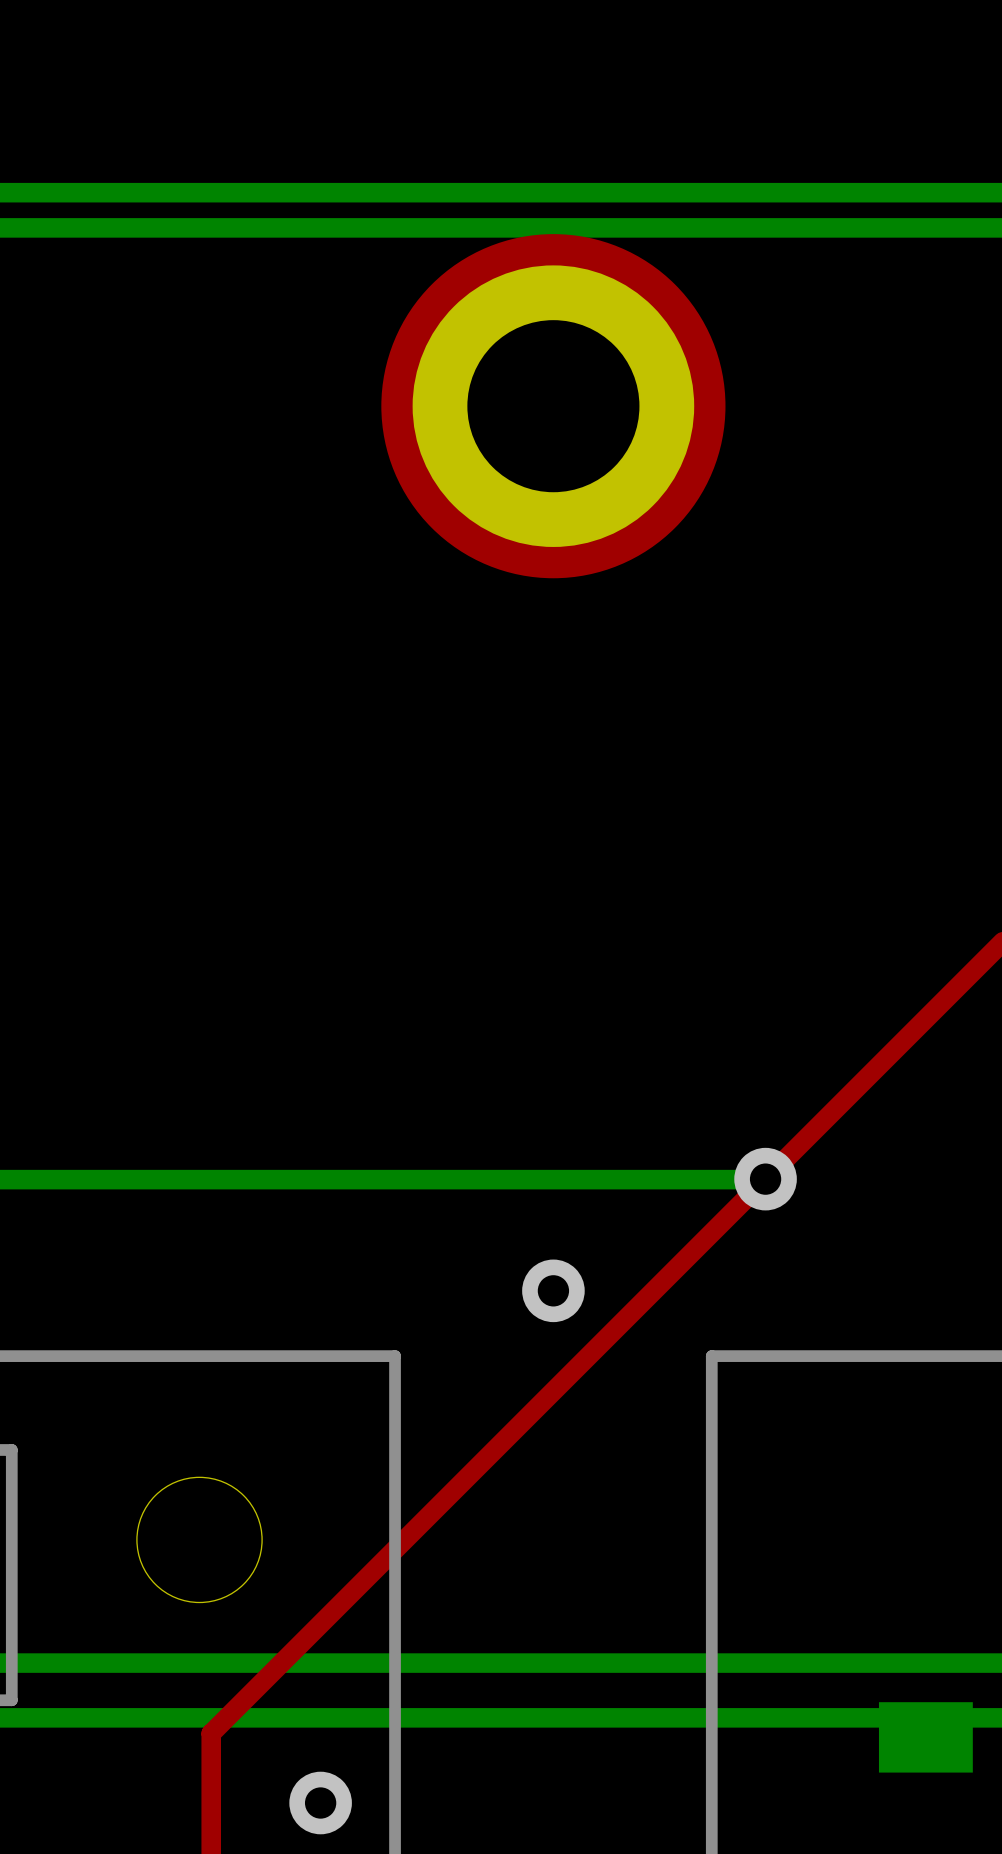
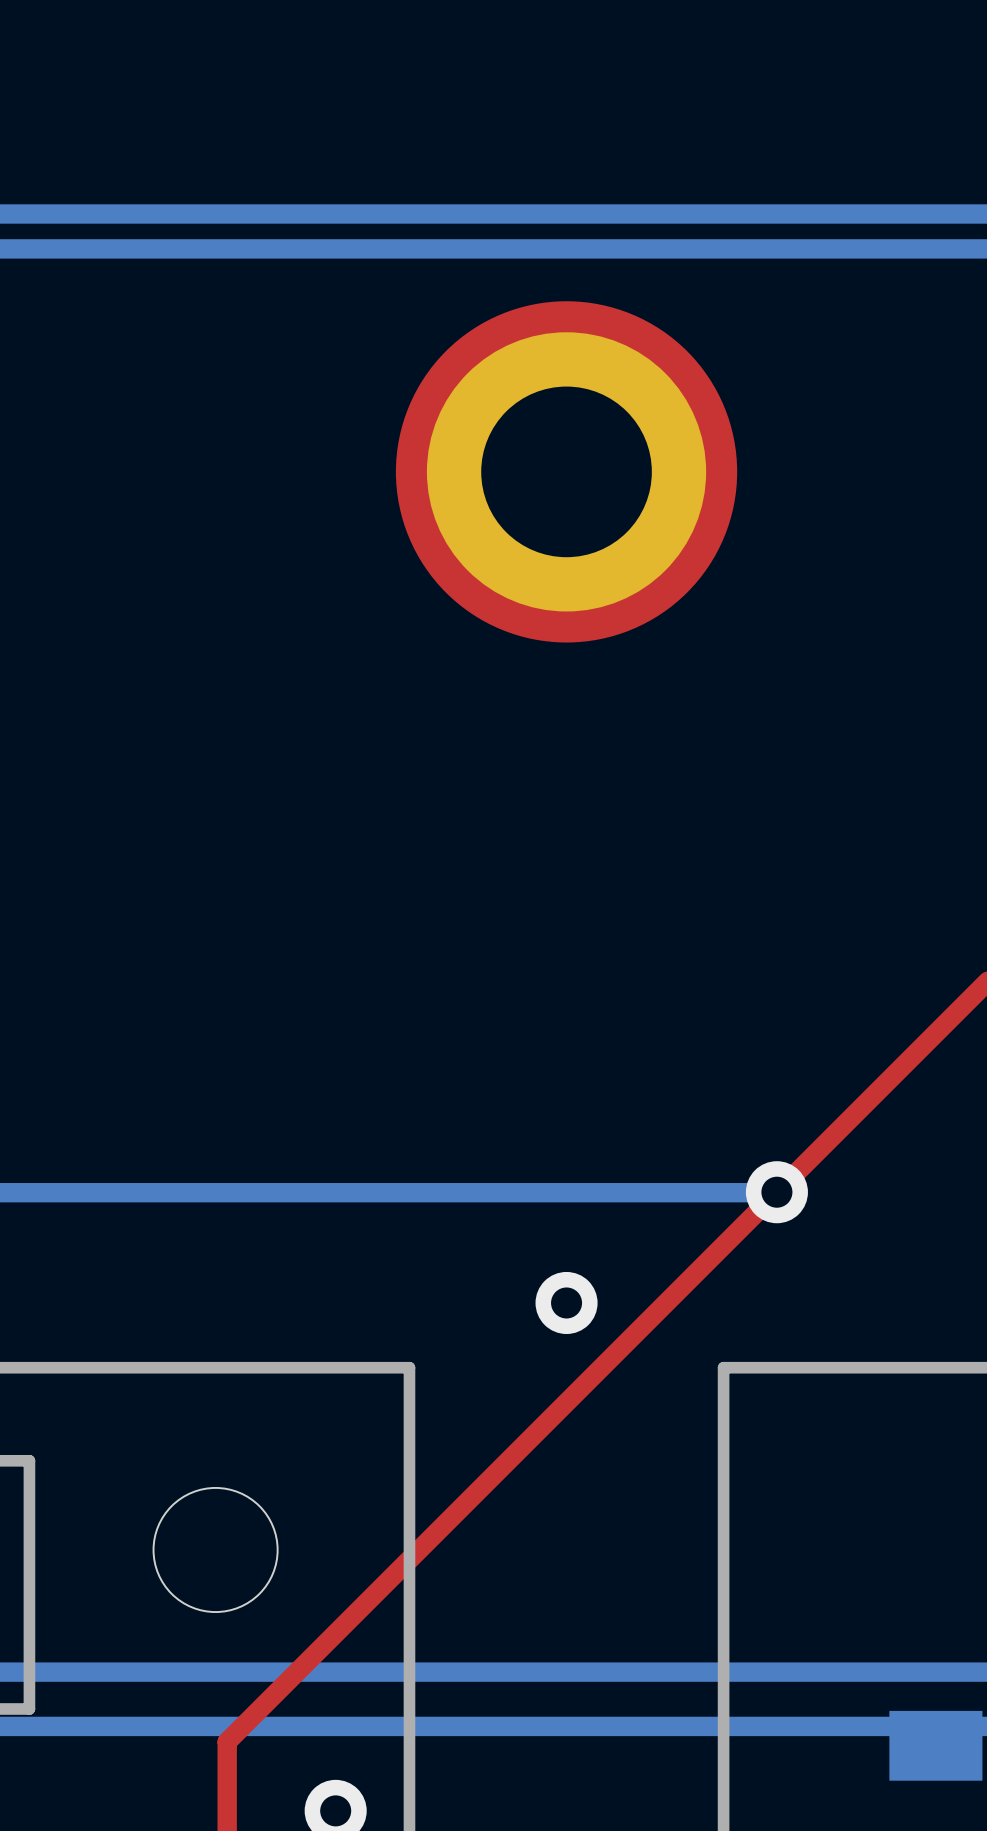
part position: (553, 406) -> (566, 471)

